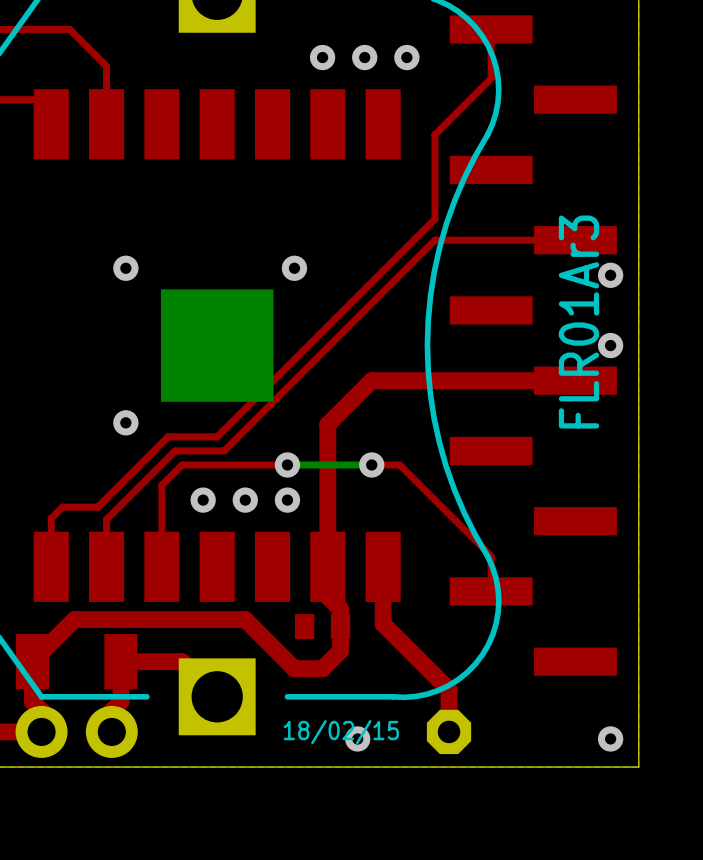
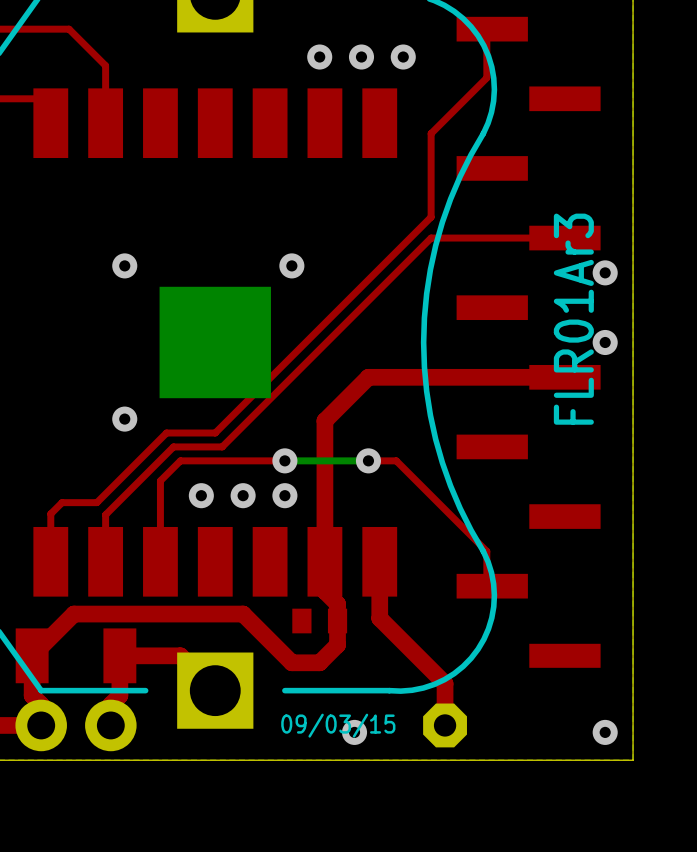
part footprint: [449, 15, 617, 676] -> [456, 16, 601, 668]
text: 18/02/15 (341, 732) -> 09/03/15 (338, 725)

